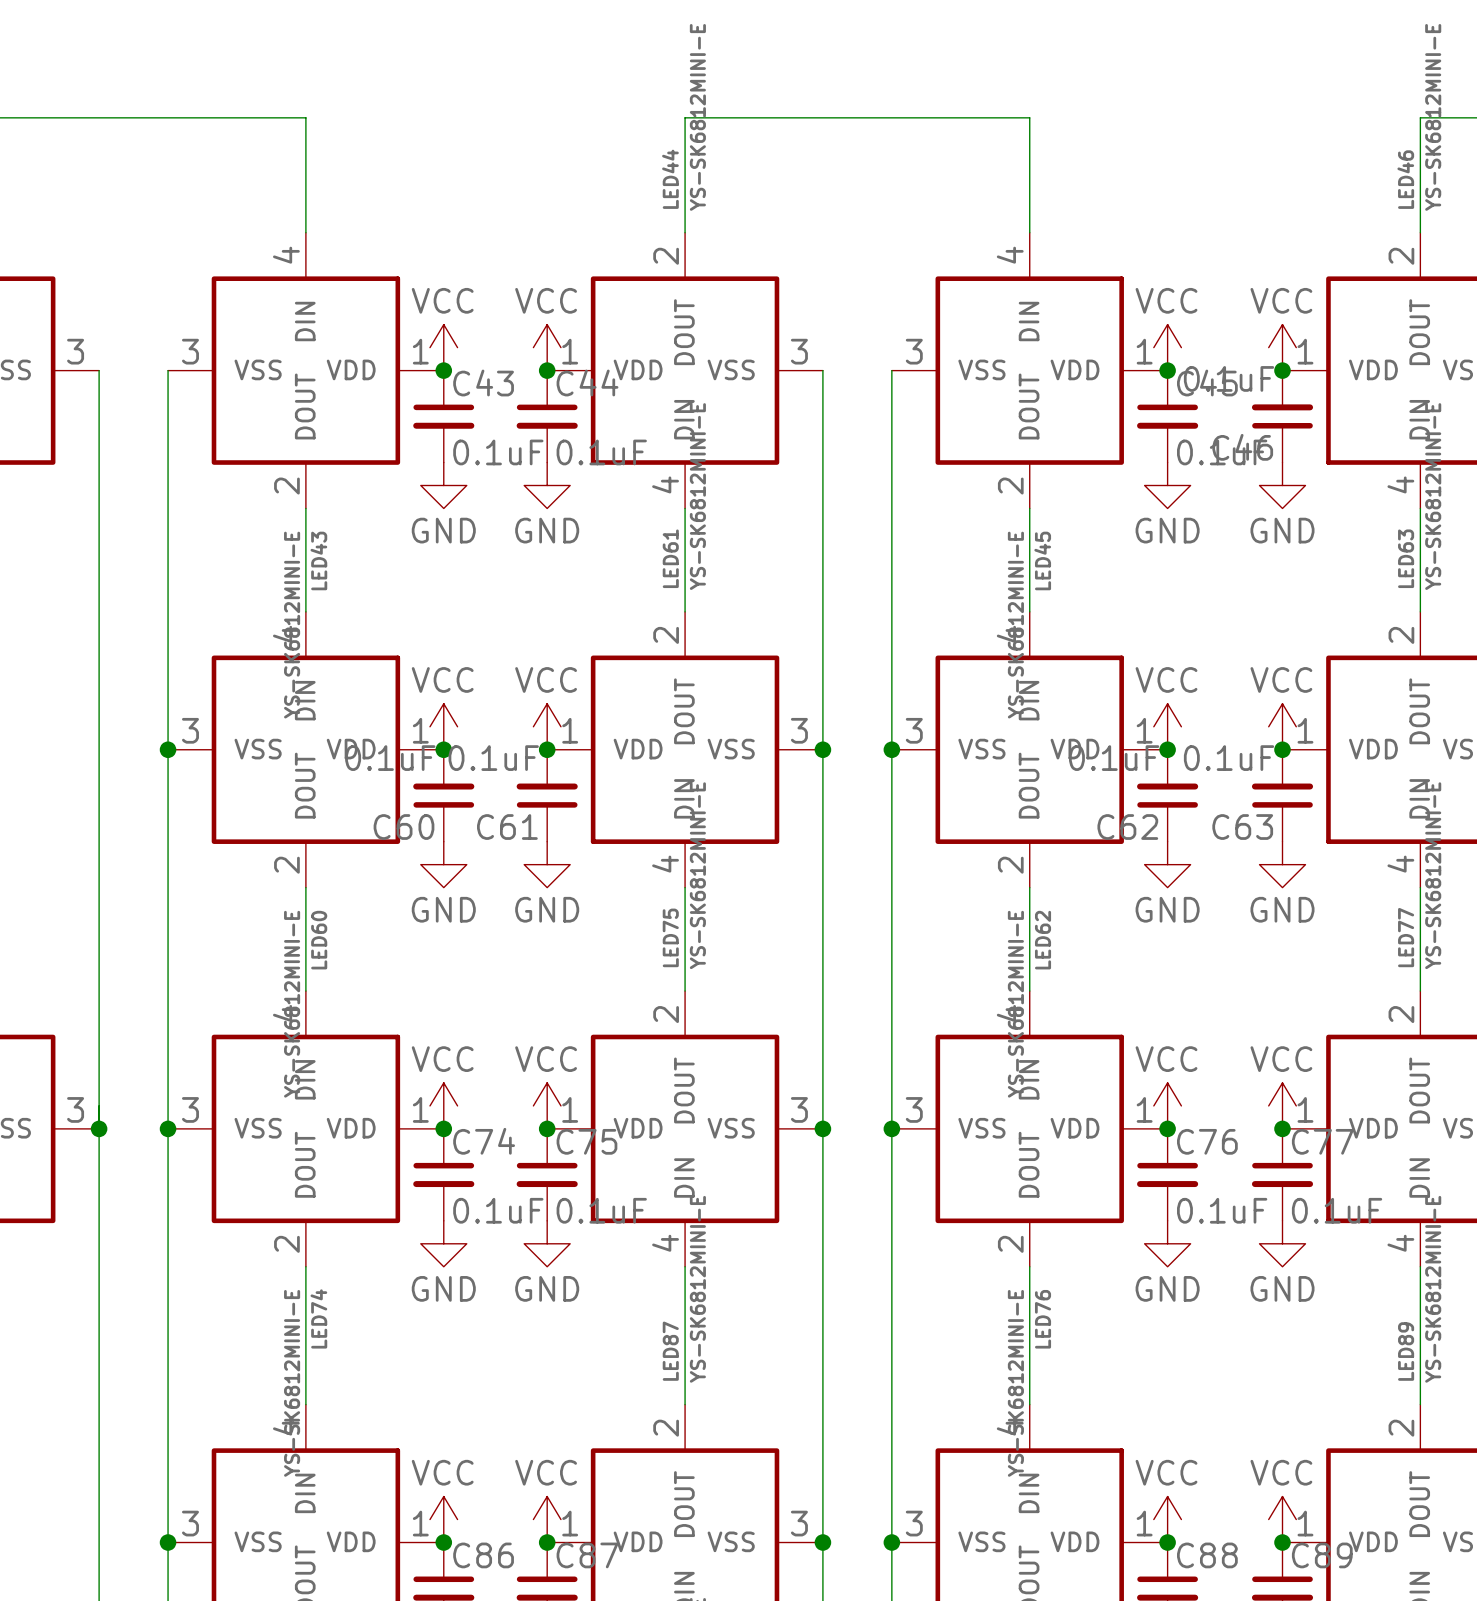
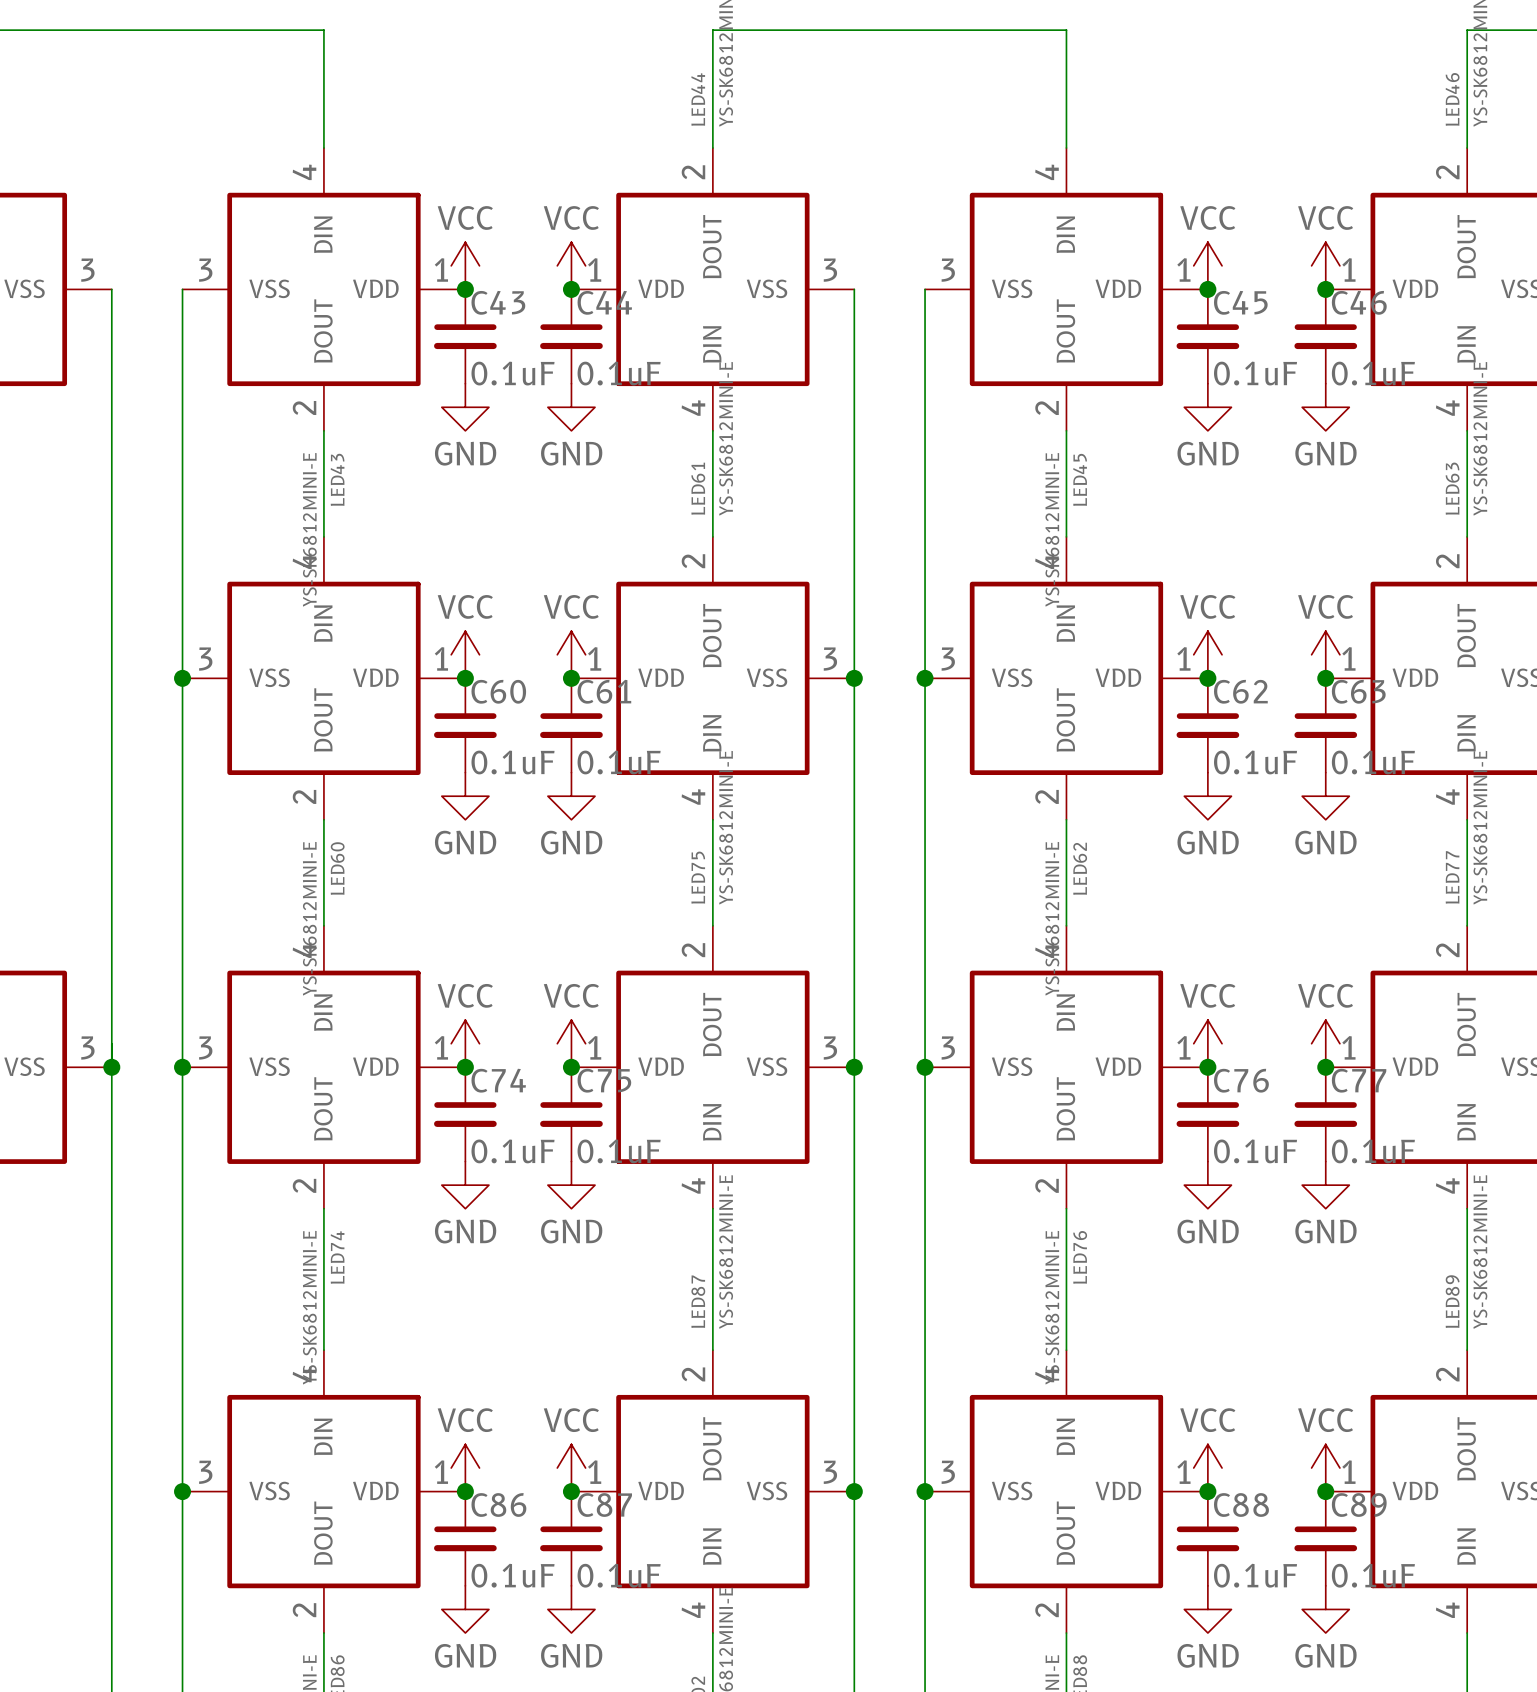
C46 rotation: 0° (1282, 416) -> 180° (1325, 336)
C60 rotation: 0° (443, 795) -> 180° (465, 725)
C61 rotation: 0° (547, 795) -> 180° (571, 725)
C62 rotation: 0° (1167, 795) -> 180° (1207, 725)
C63 rotation: 0° (1282, 795) -> 180° (1325, 725)

